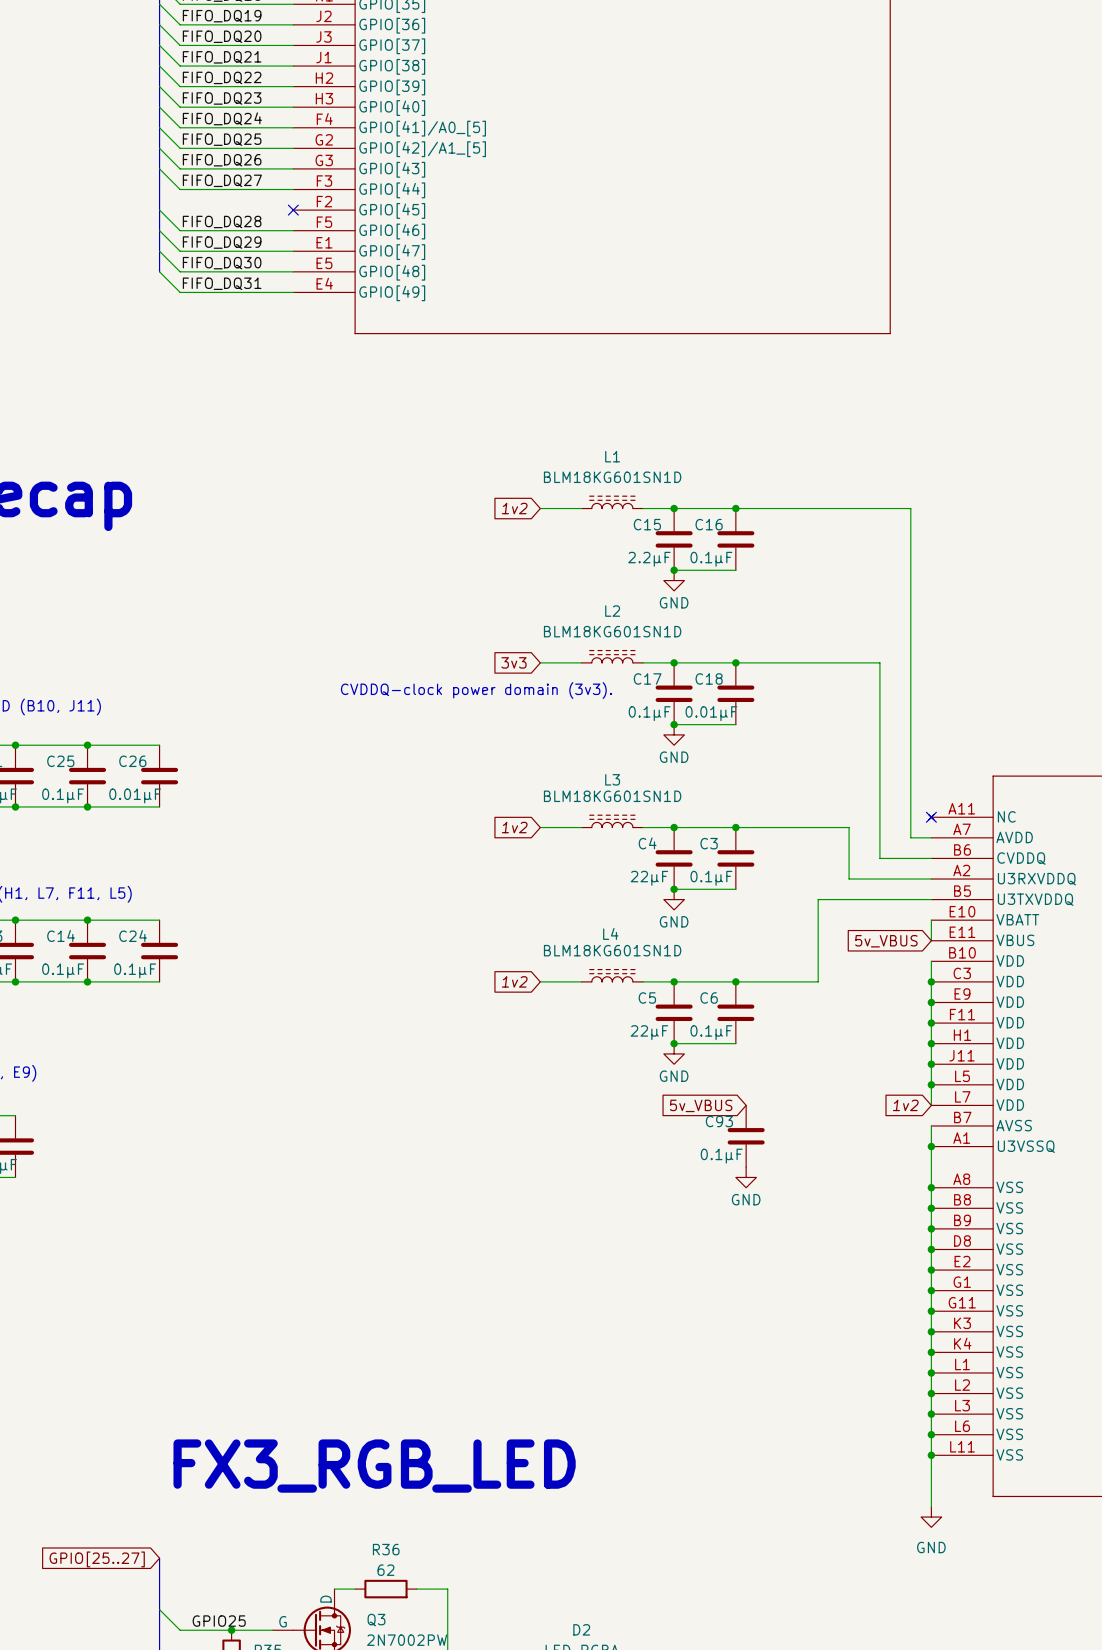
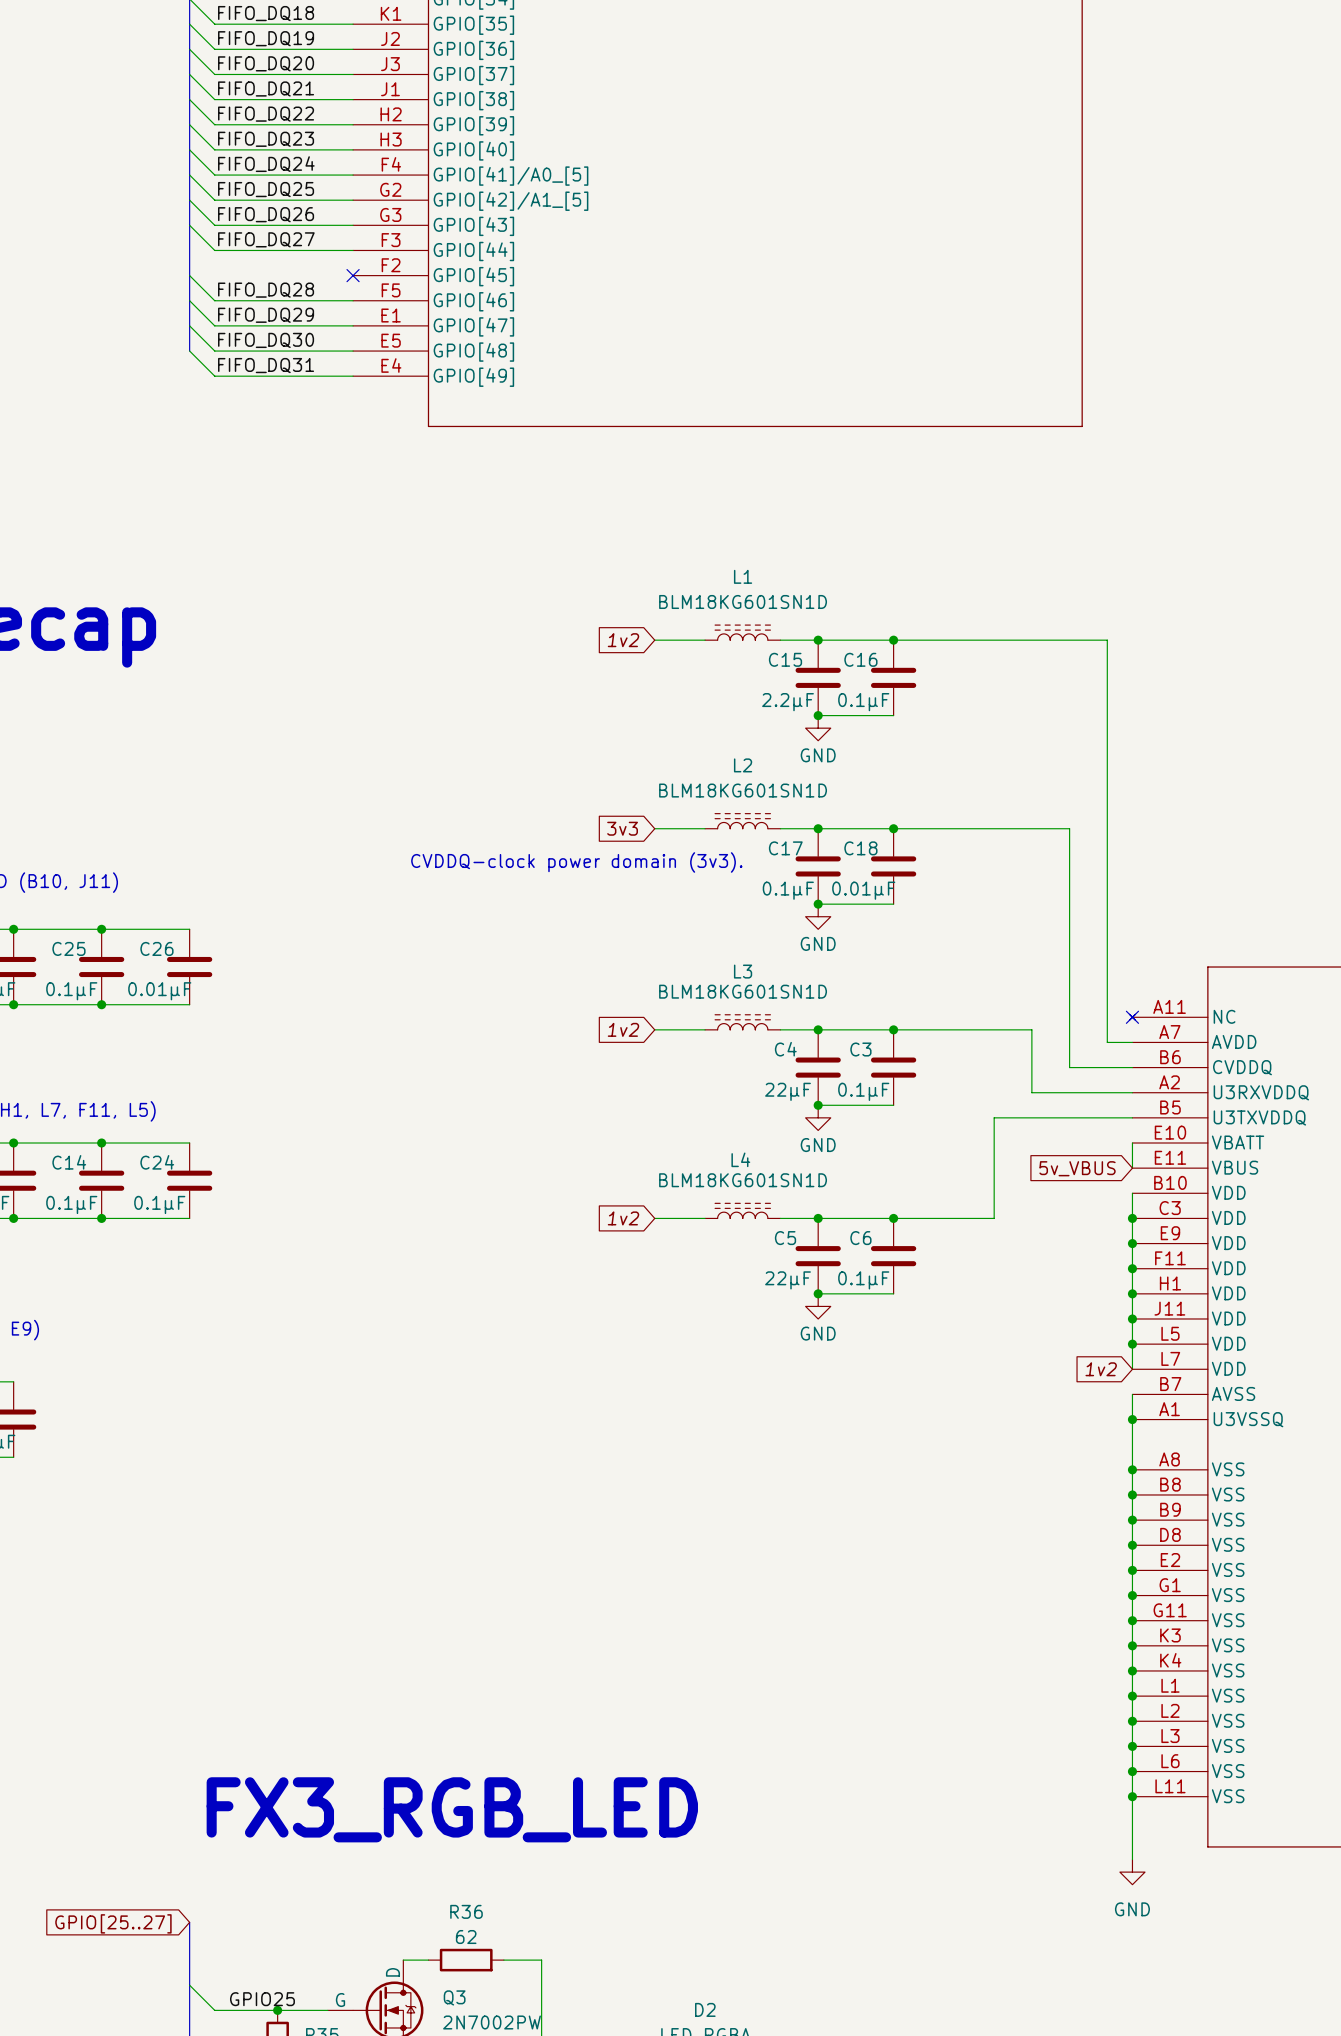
global label: 5v_VBUS (701, 1105) -> none
C93: 0.1µF (746, 1136) -> none
power symbol: GND (746, 1177) -> none

